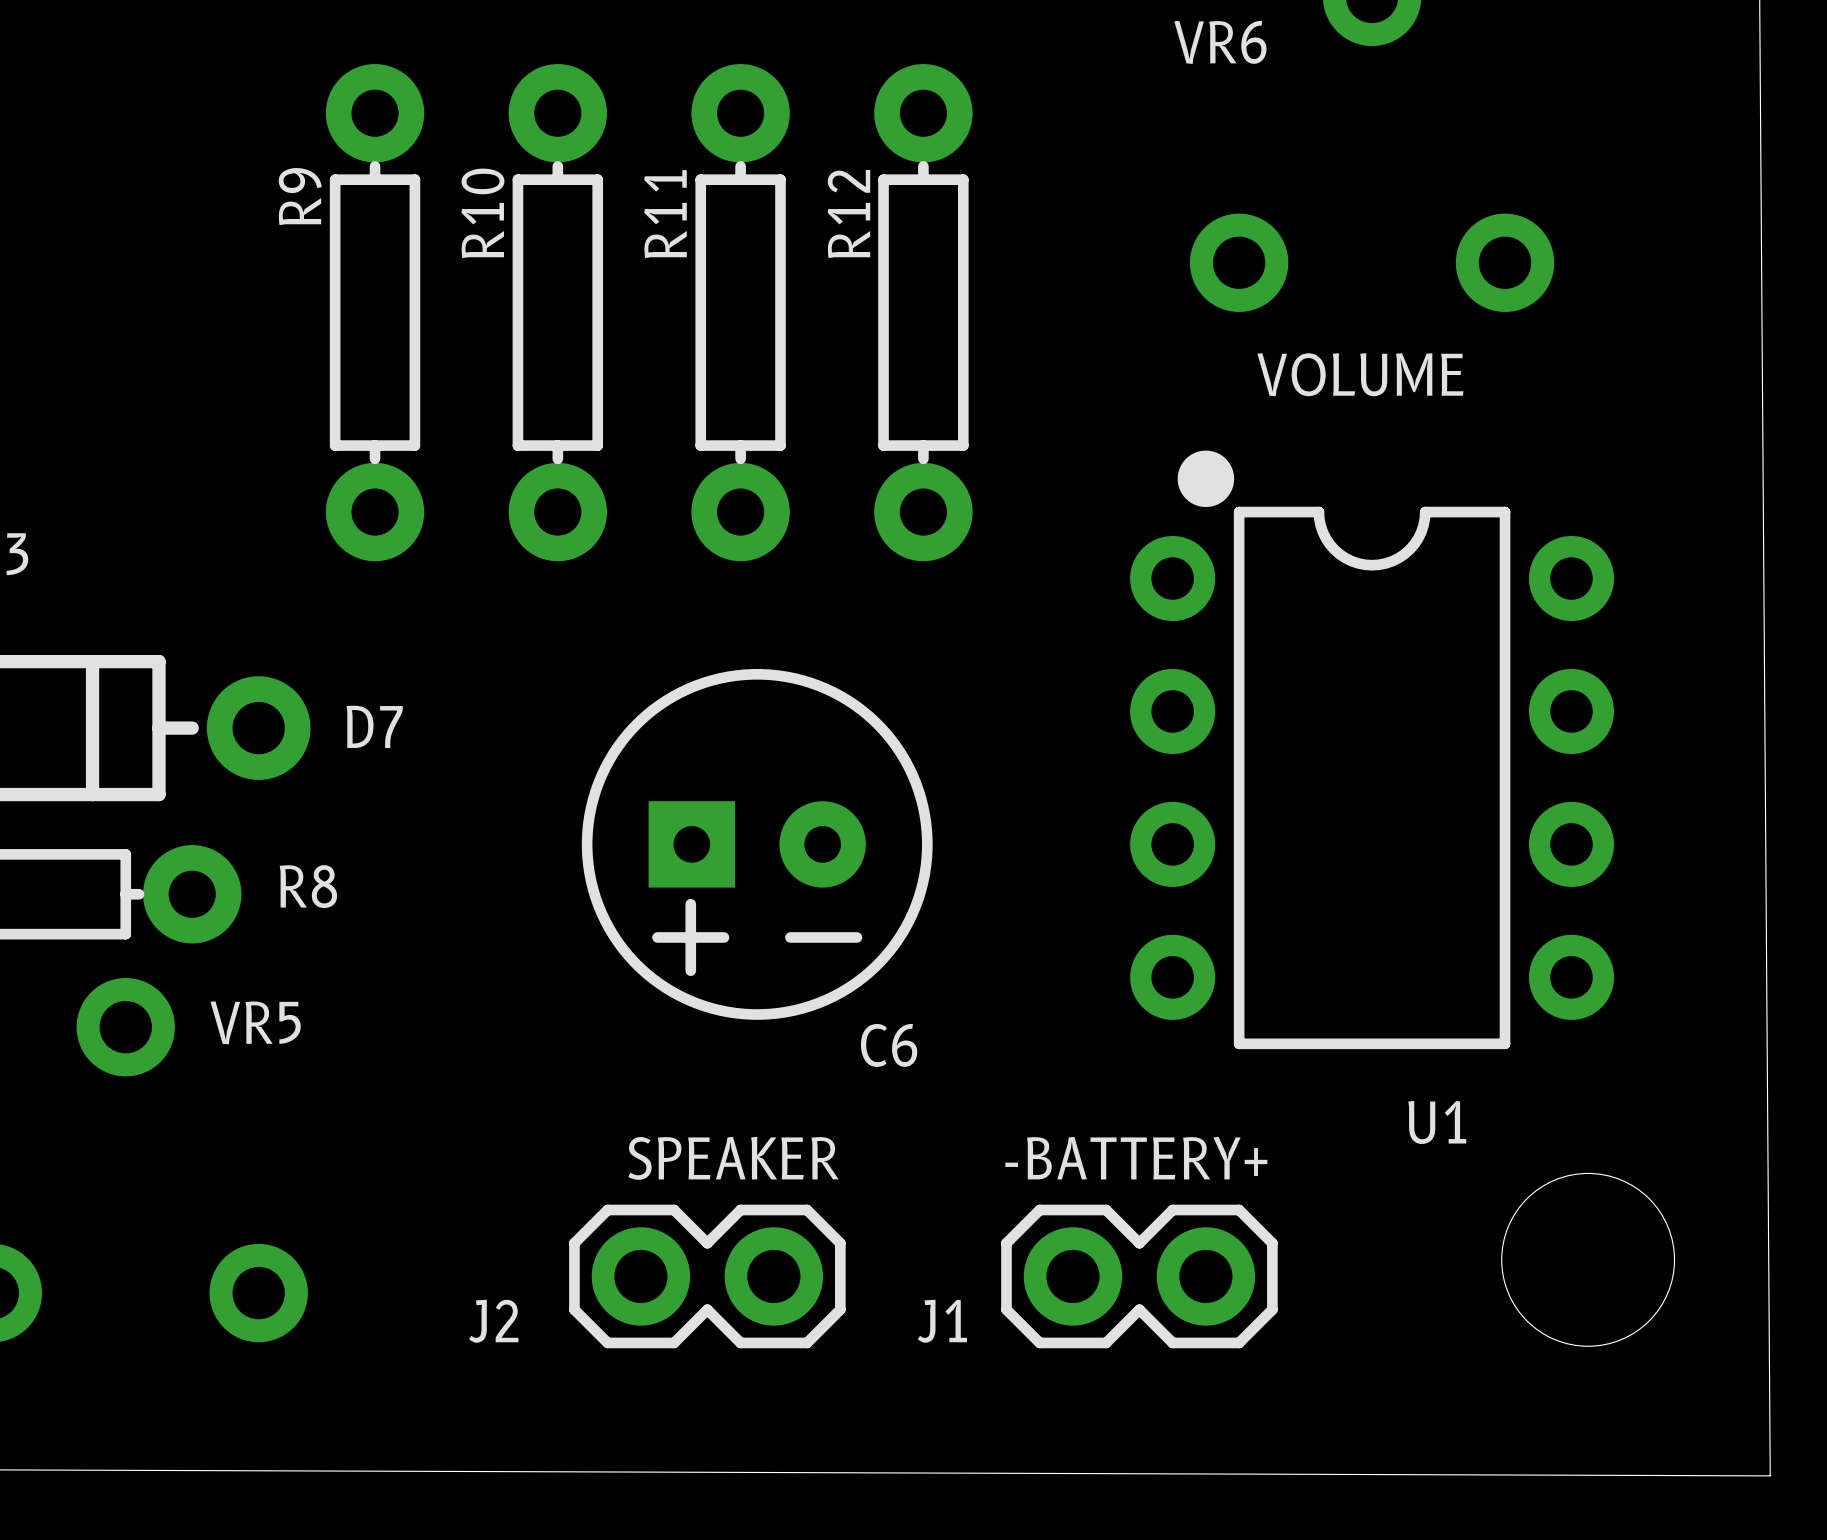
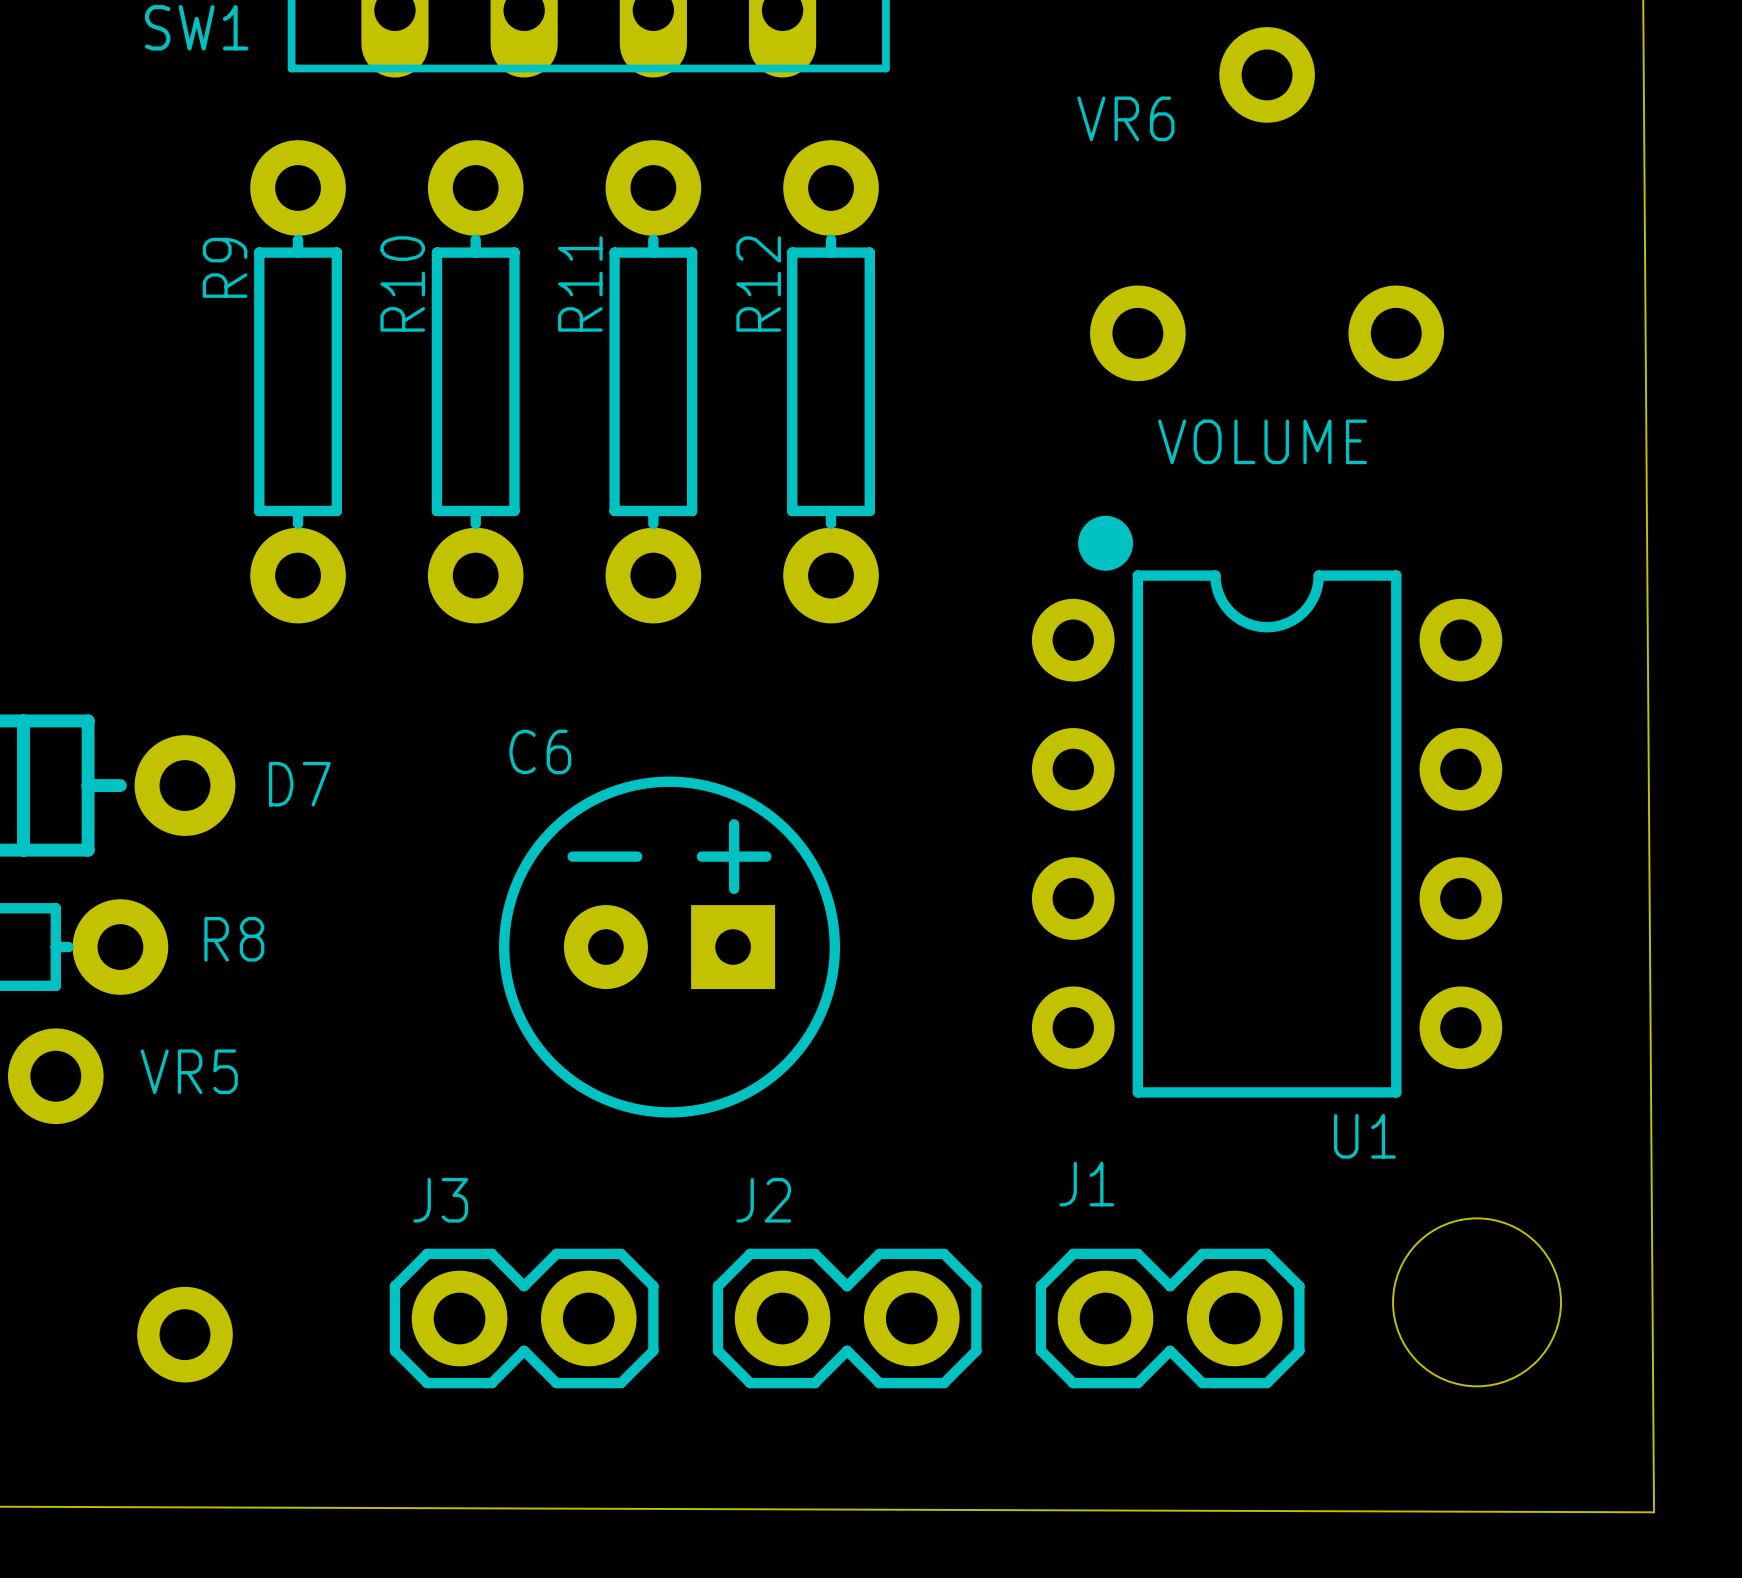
C6 rotation: 0° (757, 844) -> 180° (669, 947)
U1 name position: U1 (1437, 1122) -> U1 (1364, 1136)
J2 value: SPEAKER (733, 1158) -> none
J1 value: -BATTERY+ (1136, 1158) -> none
J3: none -> (524, 1318)
J2 position: (707, 1276) -> (847, 1318)
J1 position: (1139, 1276) -> (1170, 1318)
J2 name position: J2 (493, 1321) -> J2 (763, 1200)
J1 name position: J1 (942, 1321) -> J1 (1086, 1184)

